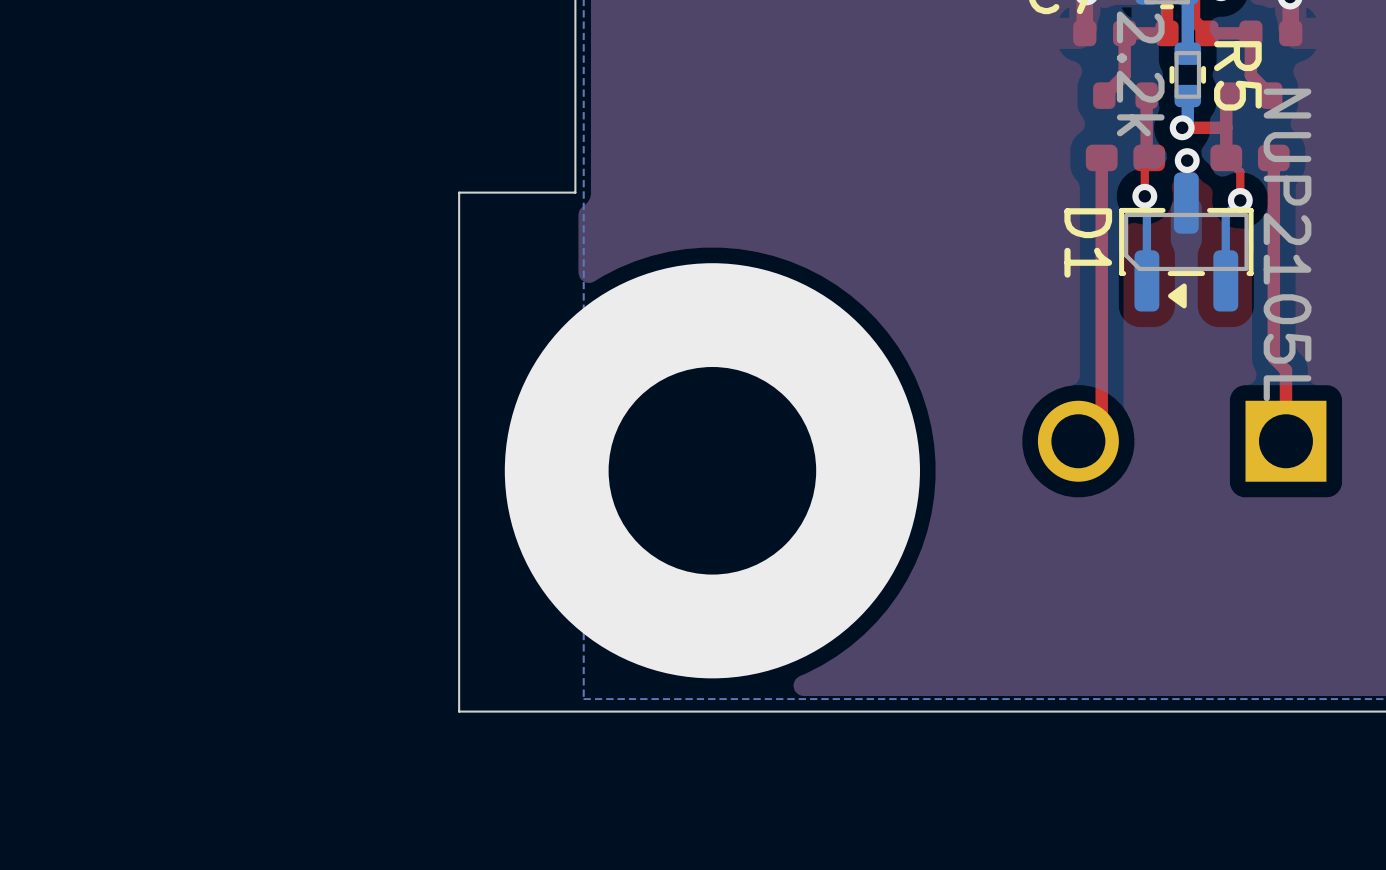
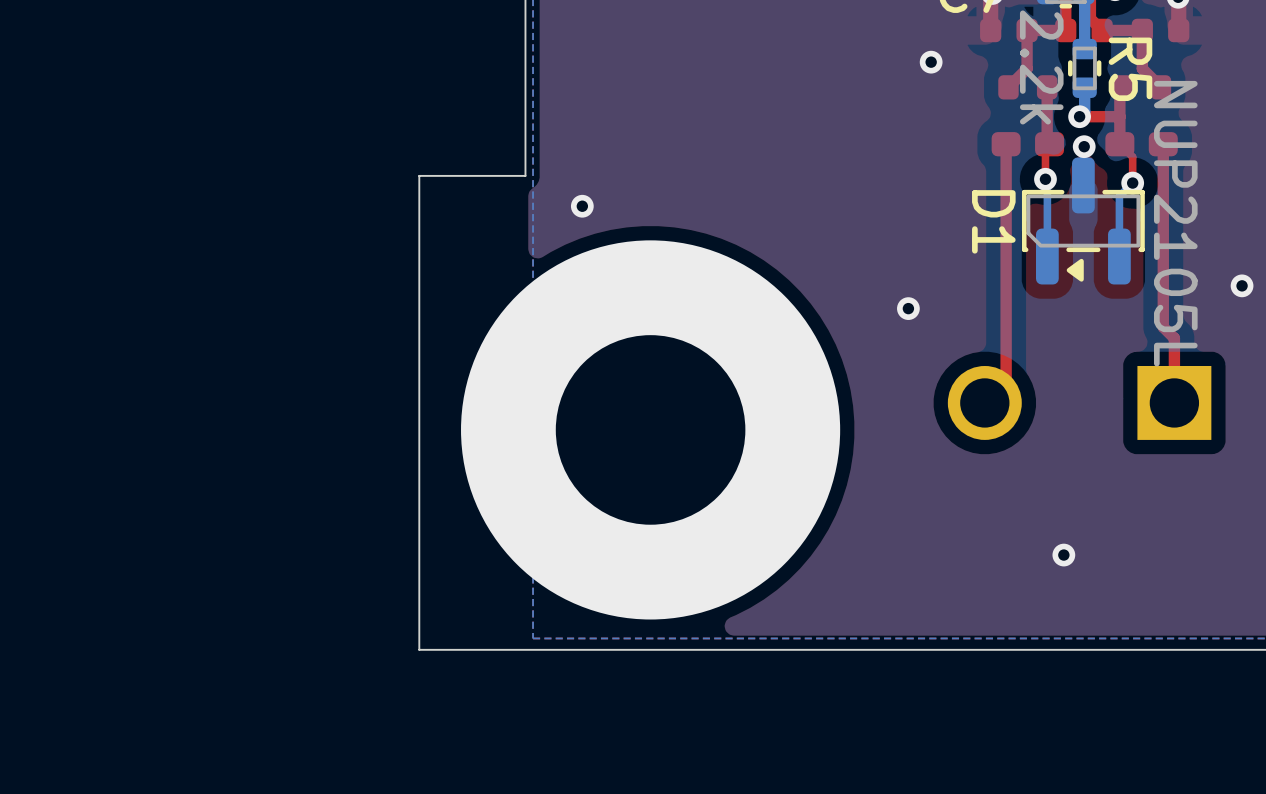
via: none -> (931, 62)
via: none -> (582, 206)
via: none -> (1242, 285)
via: none -> (908, 308)
via: none -> (1063, 555)

